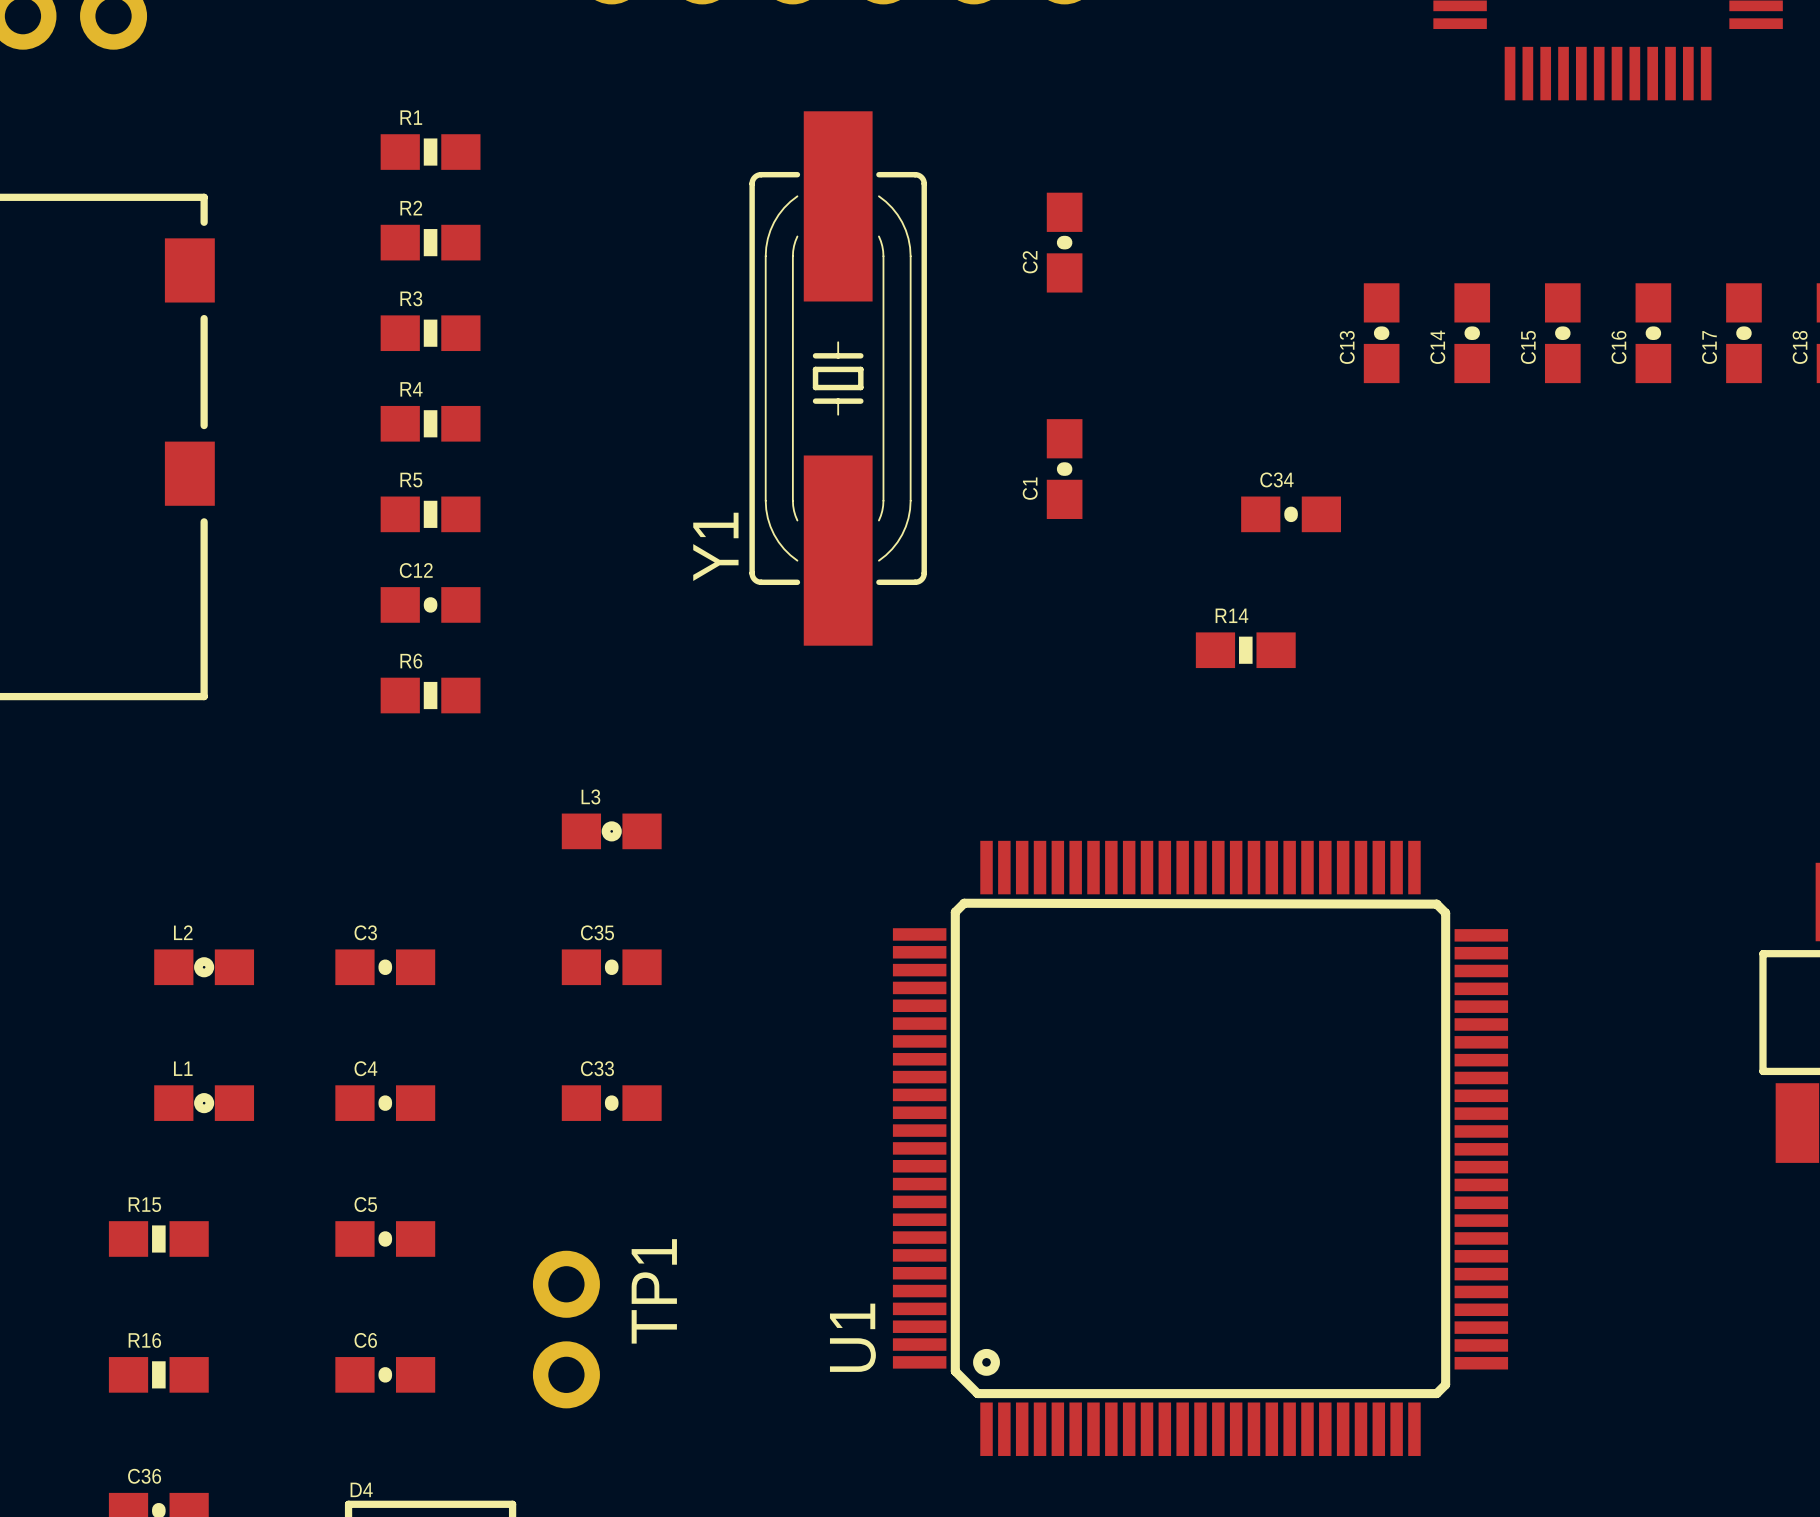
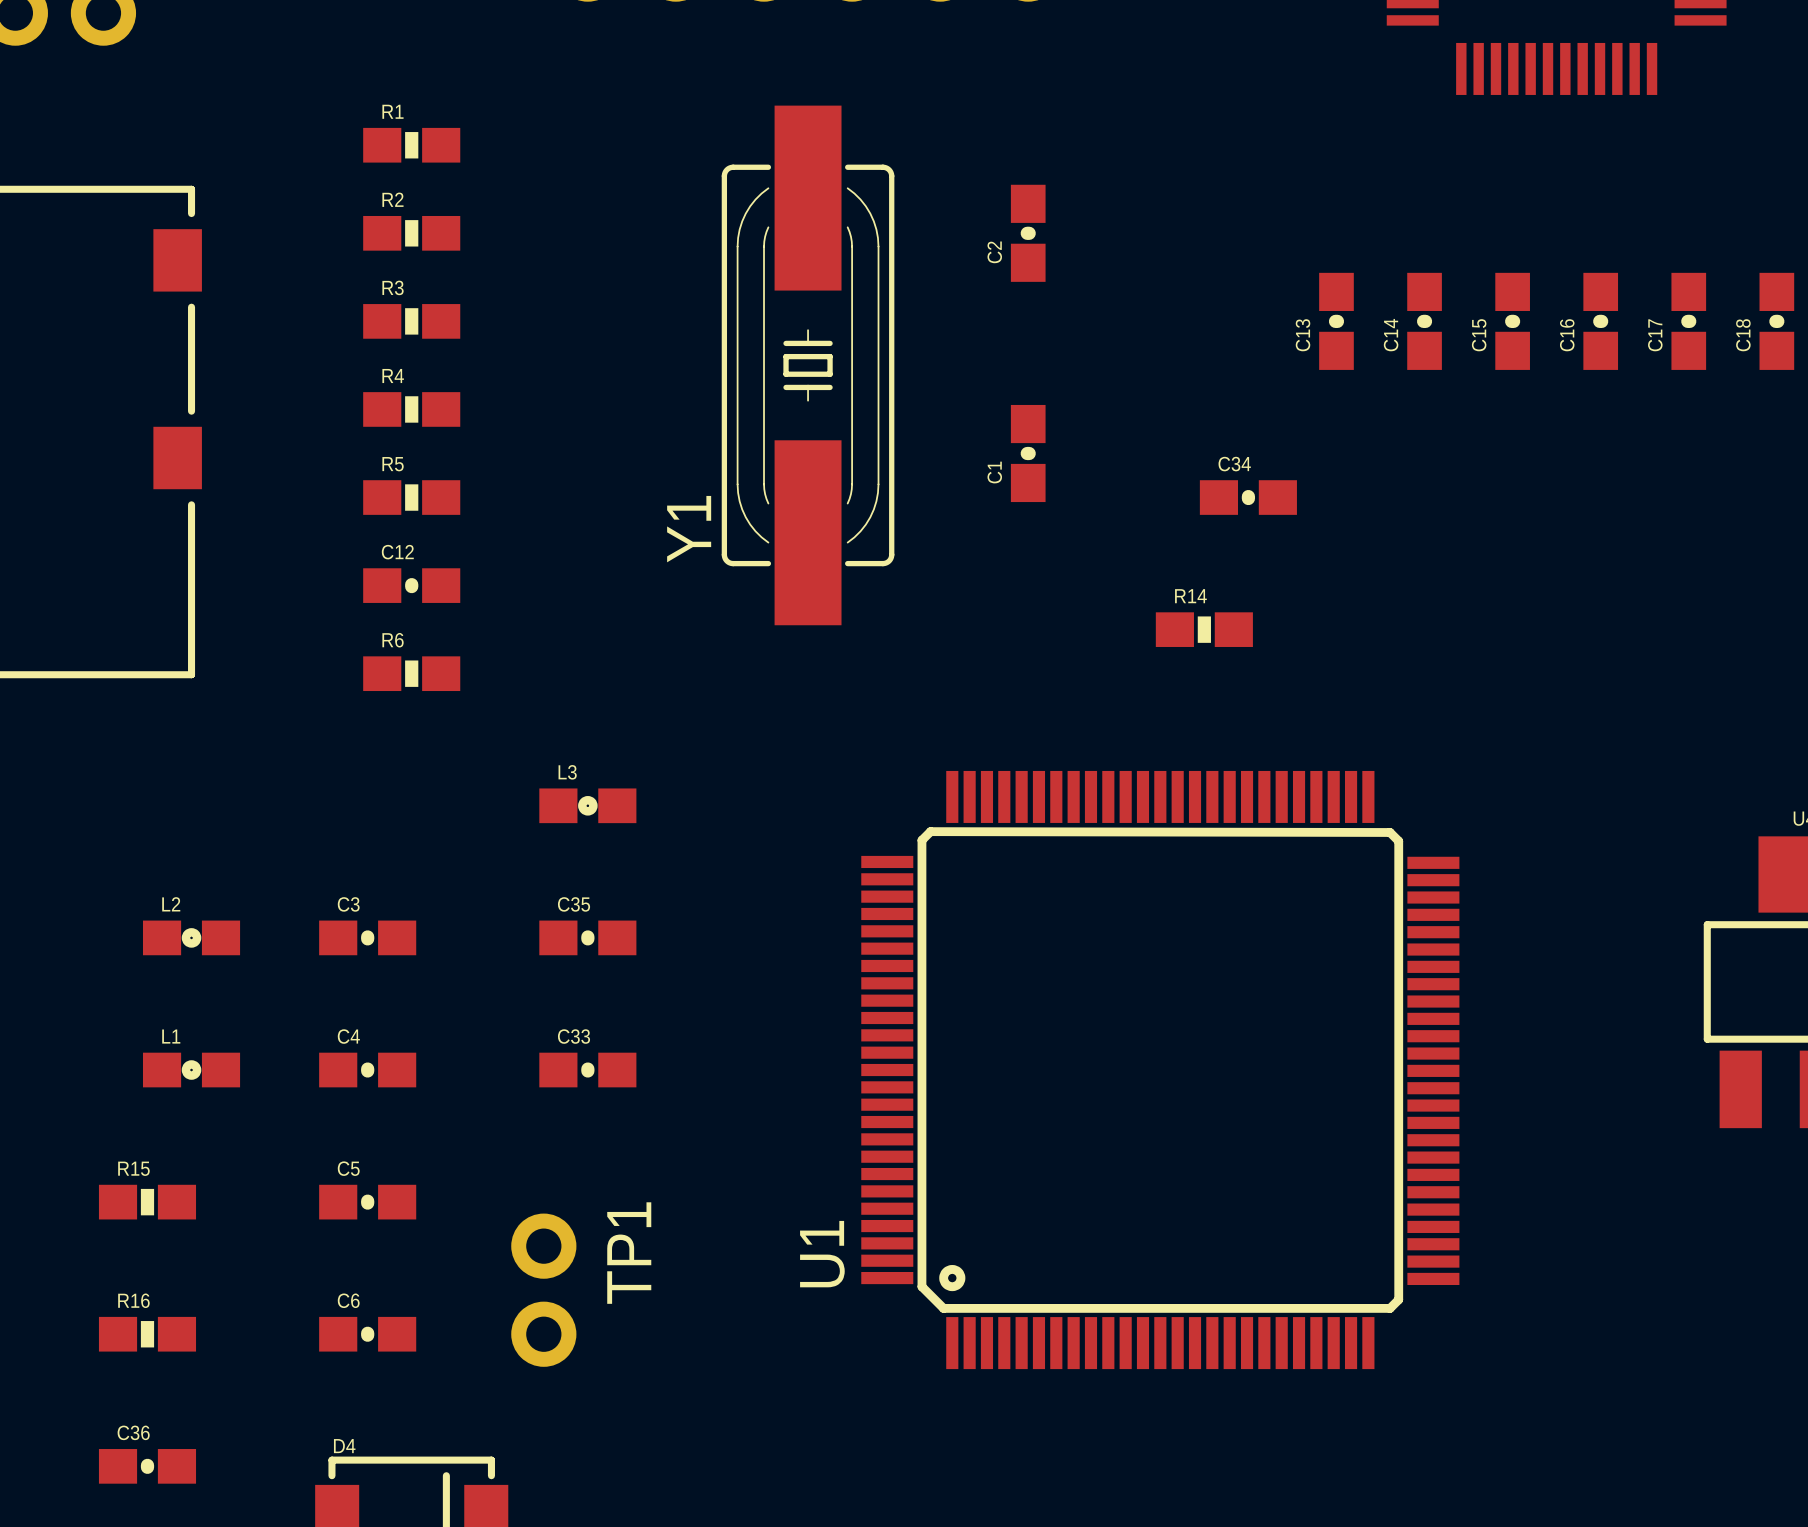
U1 position: (1200, 1148) -> (1160, 1070)

